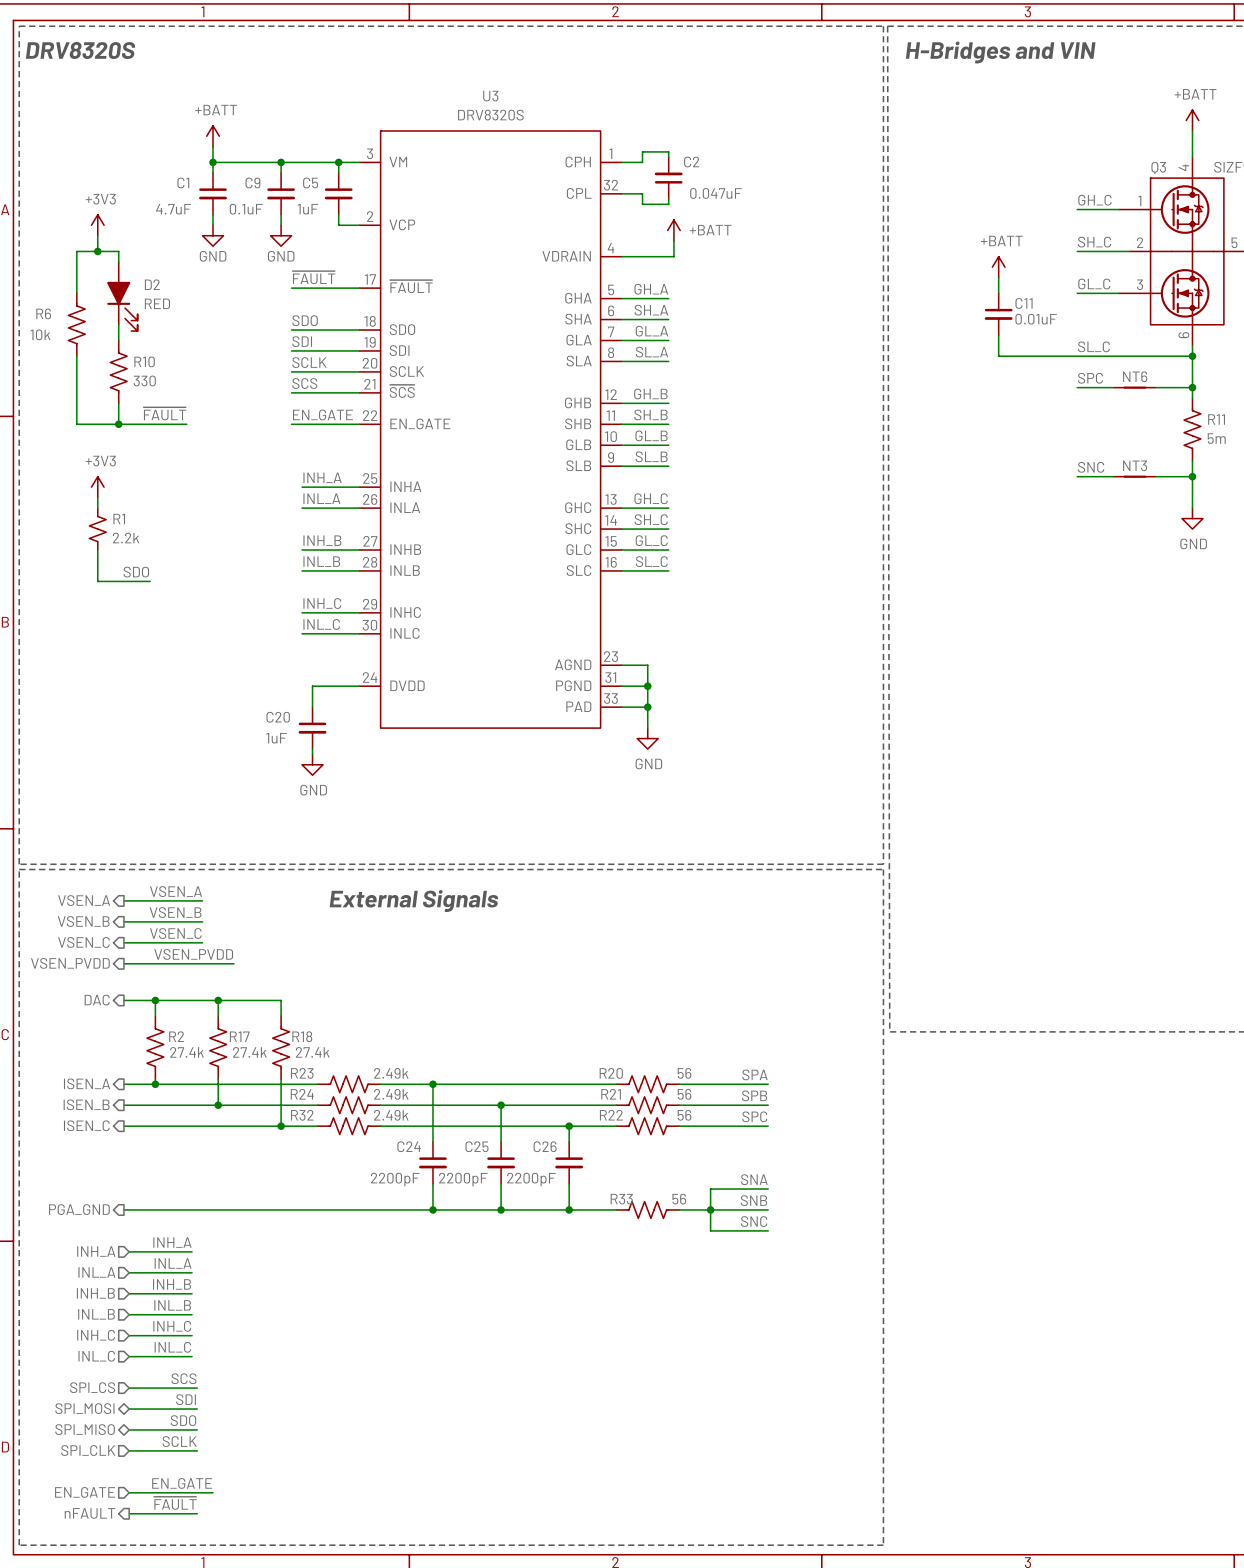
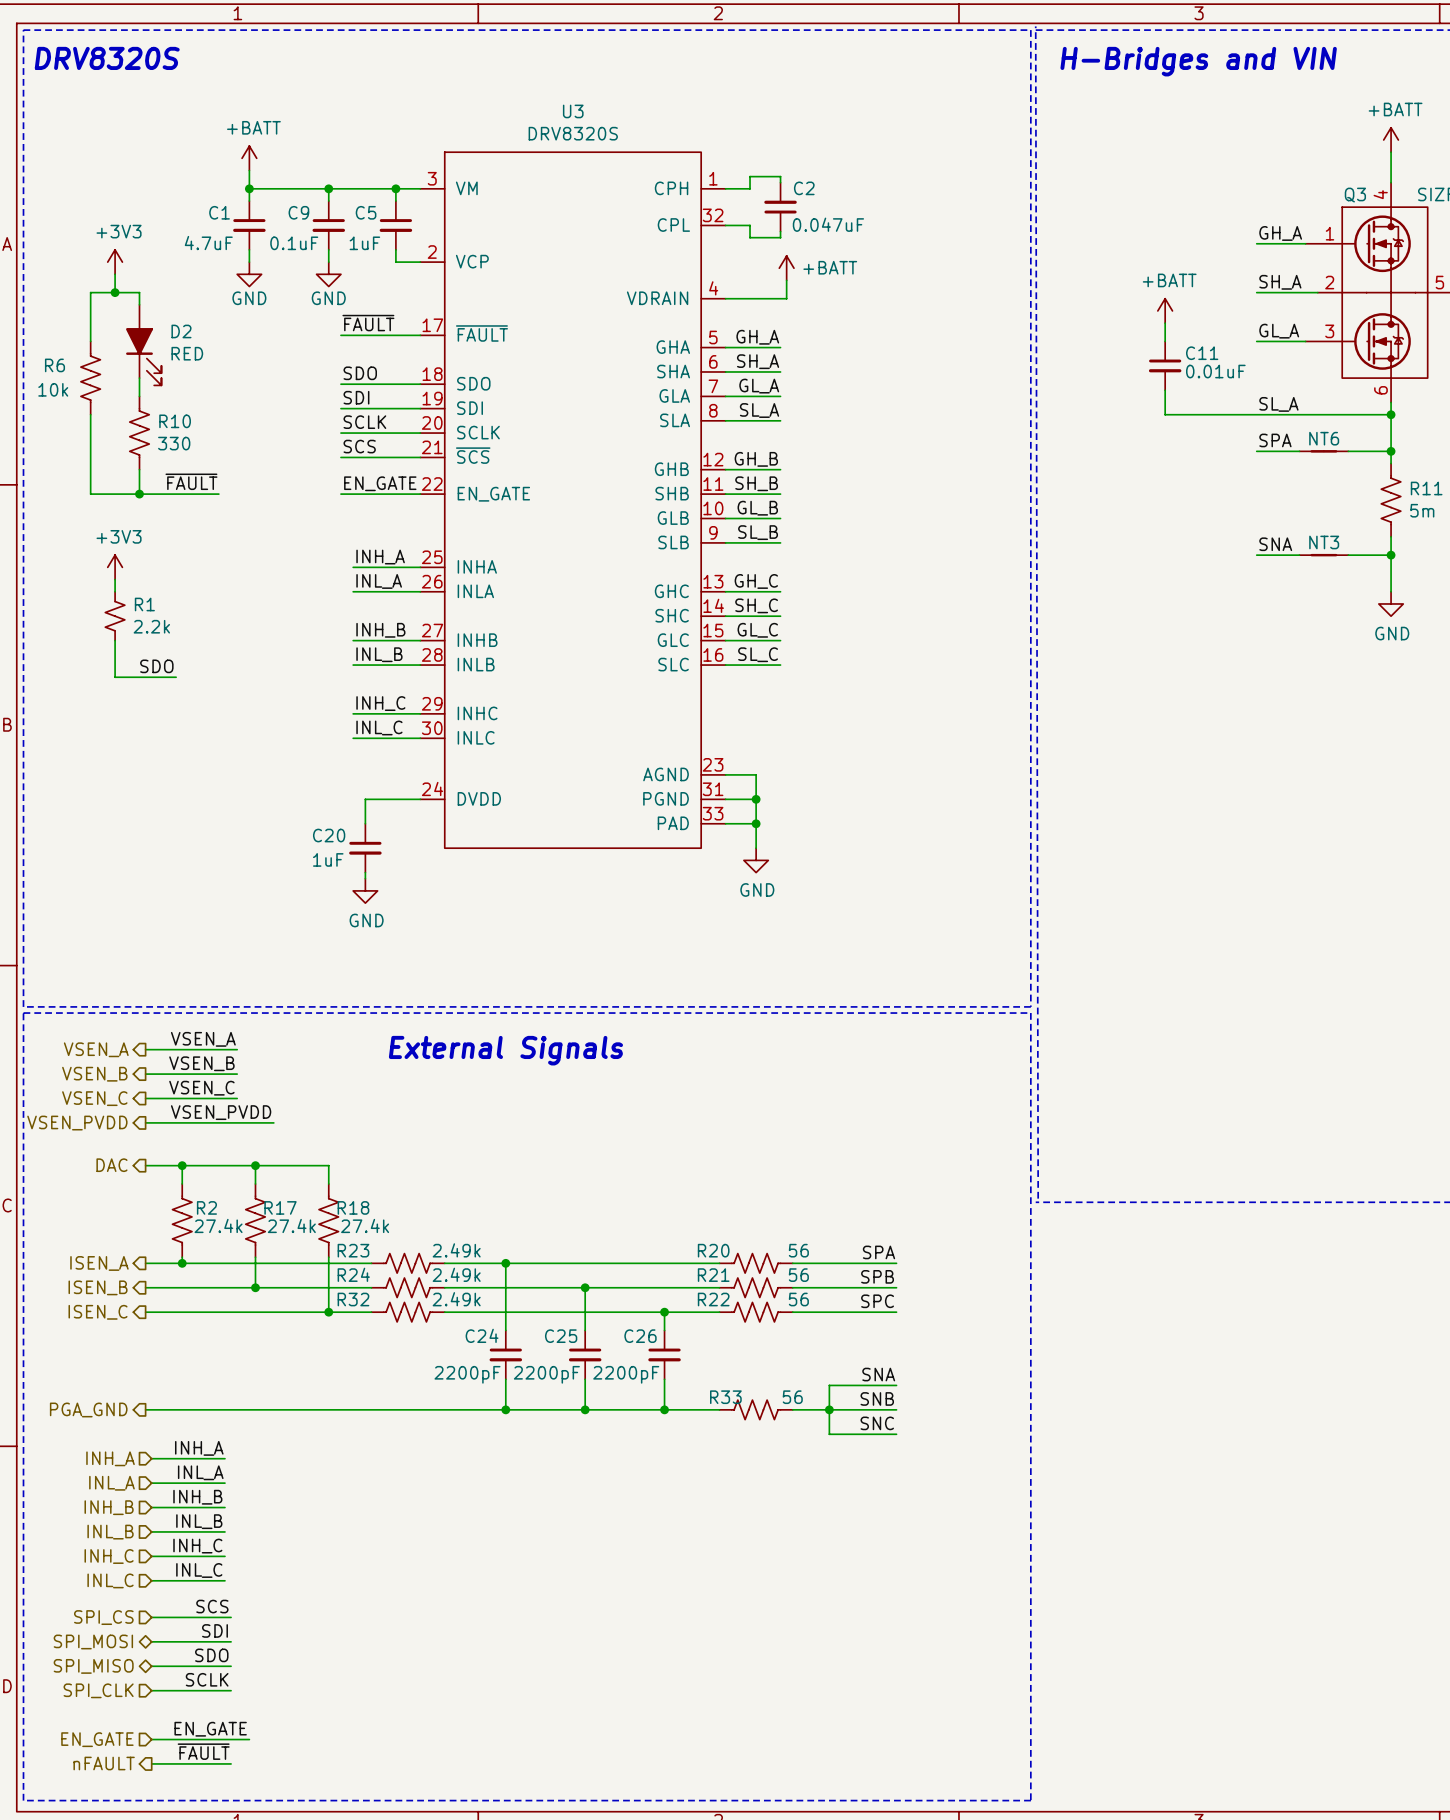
label: GH_C (1094, 200) -> GH_A (1280, 233)
label: SH_C (1094, 242) -> SH_A (1280, 282)
label: GL_C (1094, 284) -> GL_A (1279, 331)
label: SL_C (1093, 346) -> SL_A (1278, 404)
label: SPC (1090, 378) -> SPA (1275, 440)
label: SNC (1091, 467) -> SNA (1275, 544)

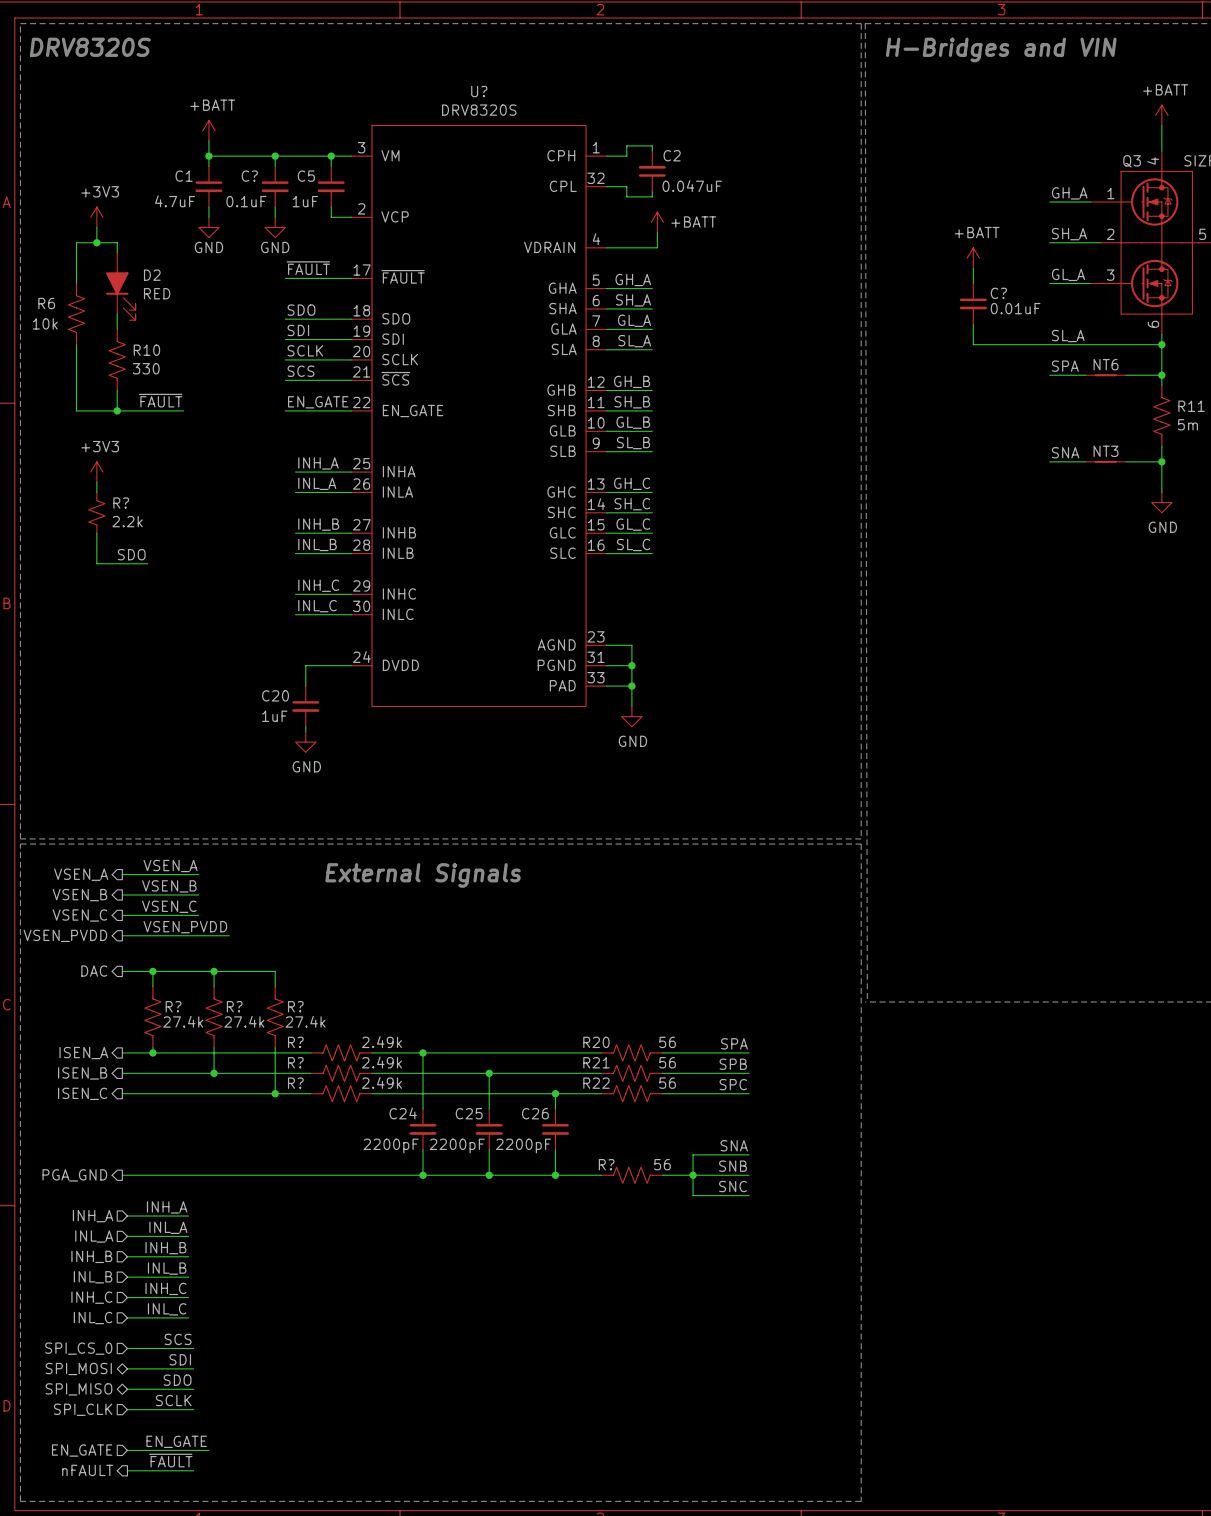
U3 name: U3 (573, 111) -> U? (479, 91)
C9 name: C9 (298, 212) -> C? (249, 176)
C11 name: C11 (1202, 353) -> C? (998, 293)
R1 name: R1 (144, 604) -> R? (121, 503)
R2 name: R2 (206, 1207) -> R? (173, 1006)
R17 name: R17 (280, 1207) -> R? (234, 1006)
R18 name: R18 (353, 1207) -> R? (295, 1006)
R23 name: R23 (353, 1250) -> R? (295, 1042)
R24 name: R24 (353, 1274) -> R? (295, 1062)
R32 name: R32 (353, 1299) -> R? (295, 1083)
R33 name: R33 (725, 1397) -> R? (606, 1164)
hierarchical label: SPI_CS (103, 1617) -> SPI_CS_0 (78, 1348)

